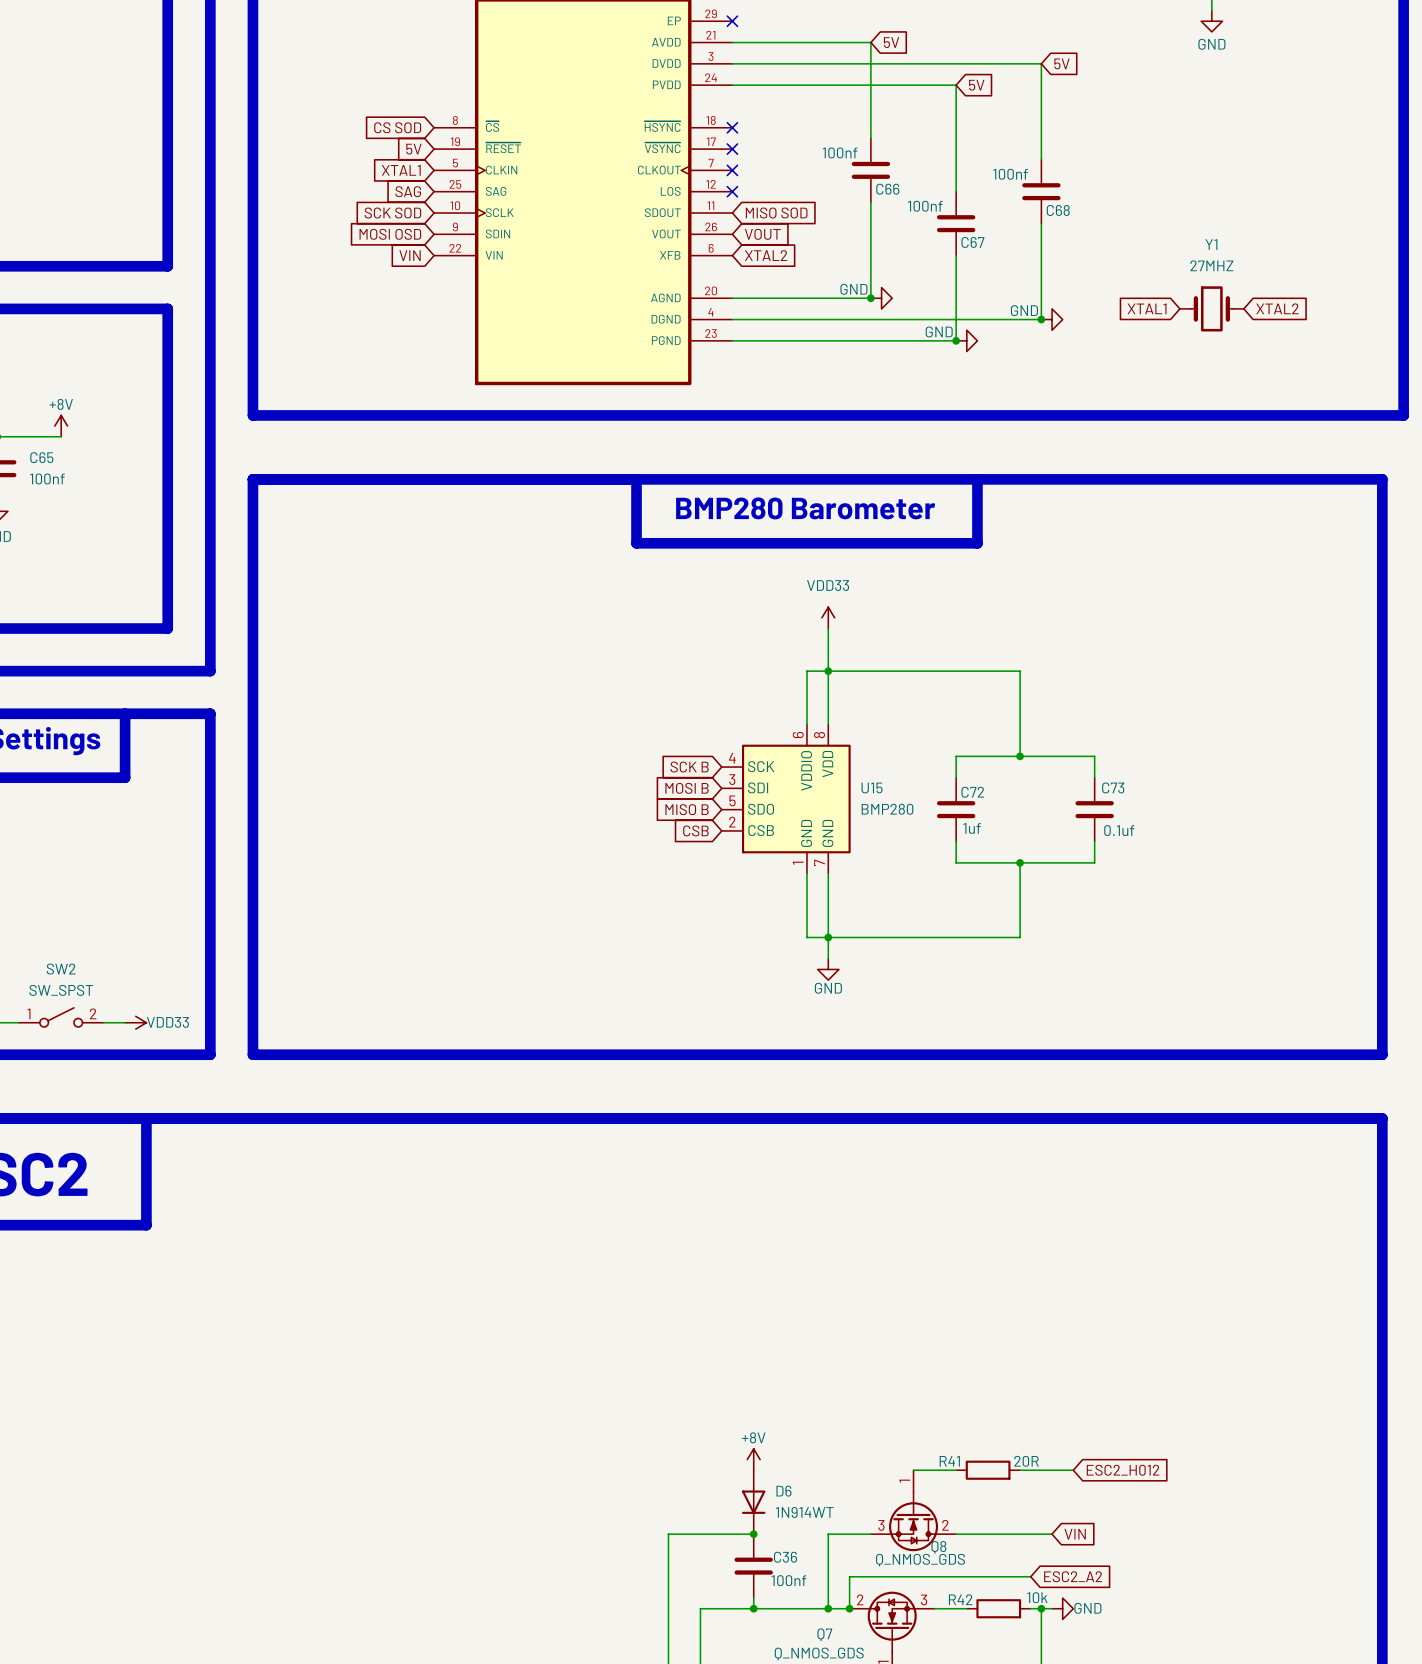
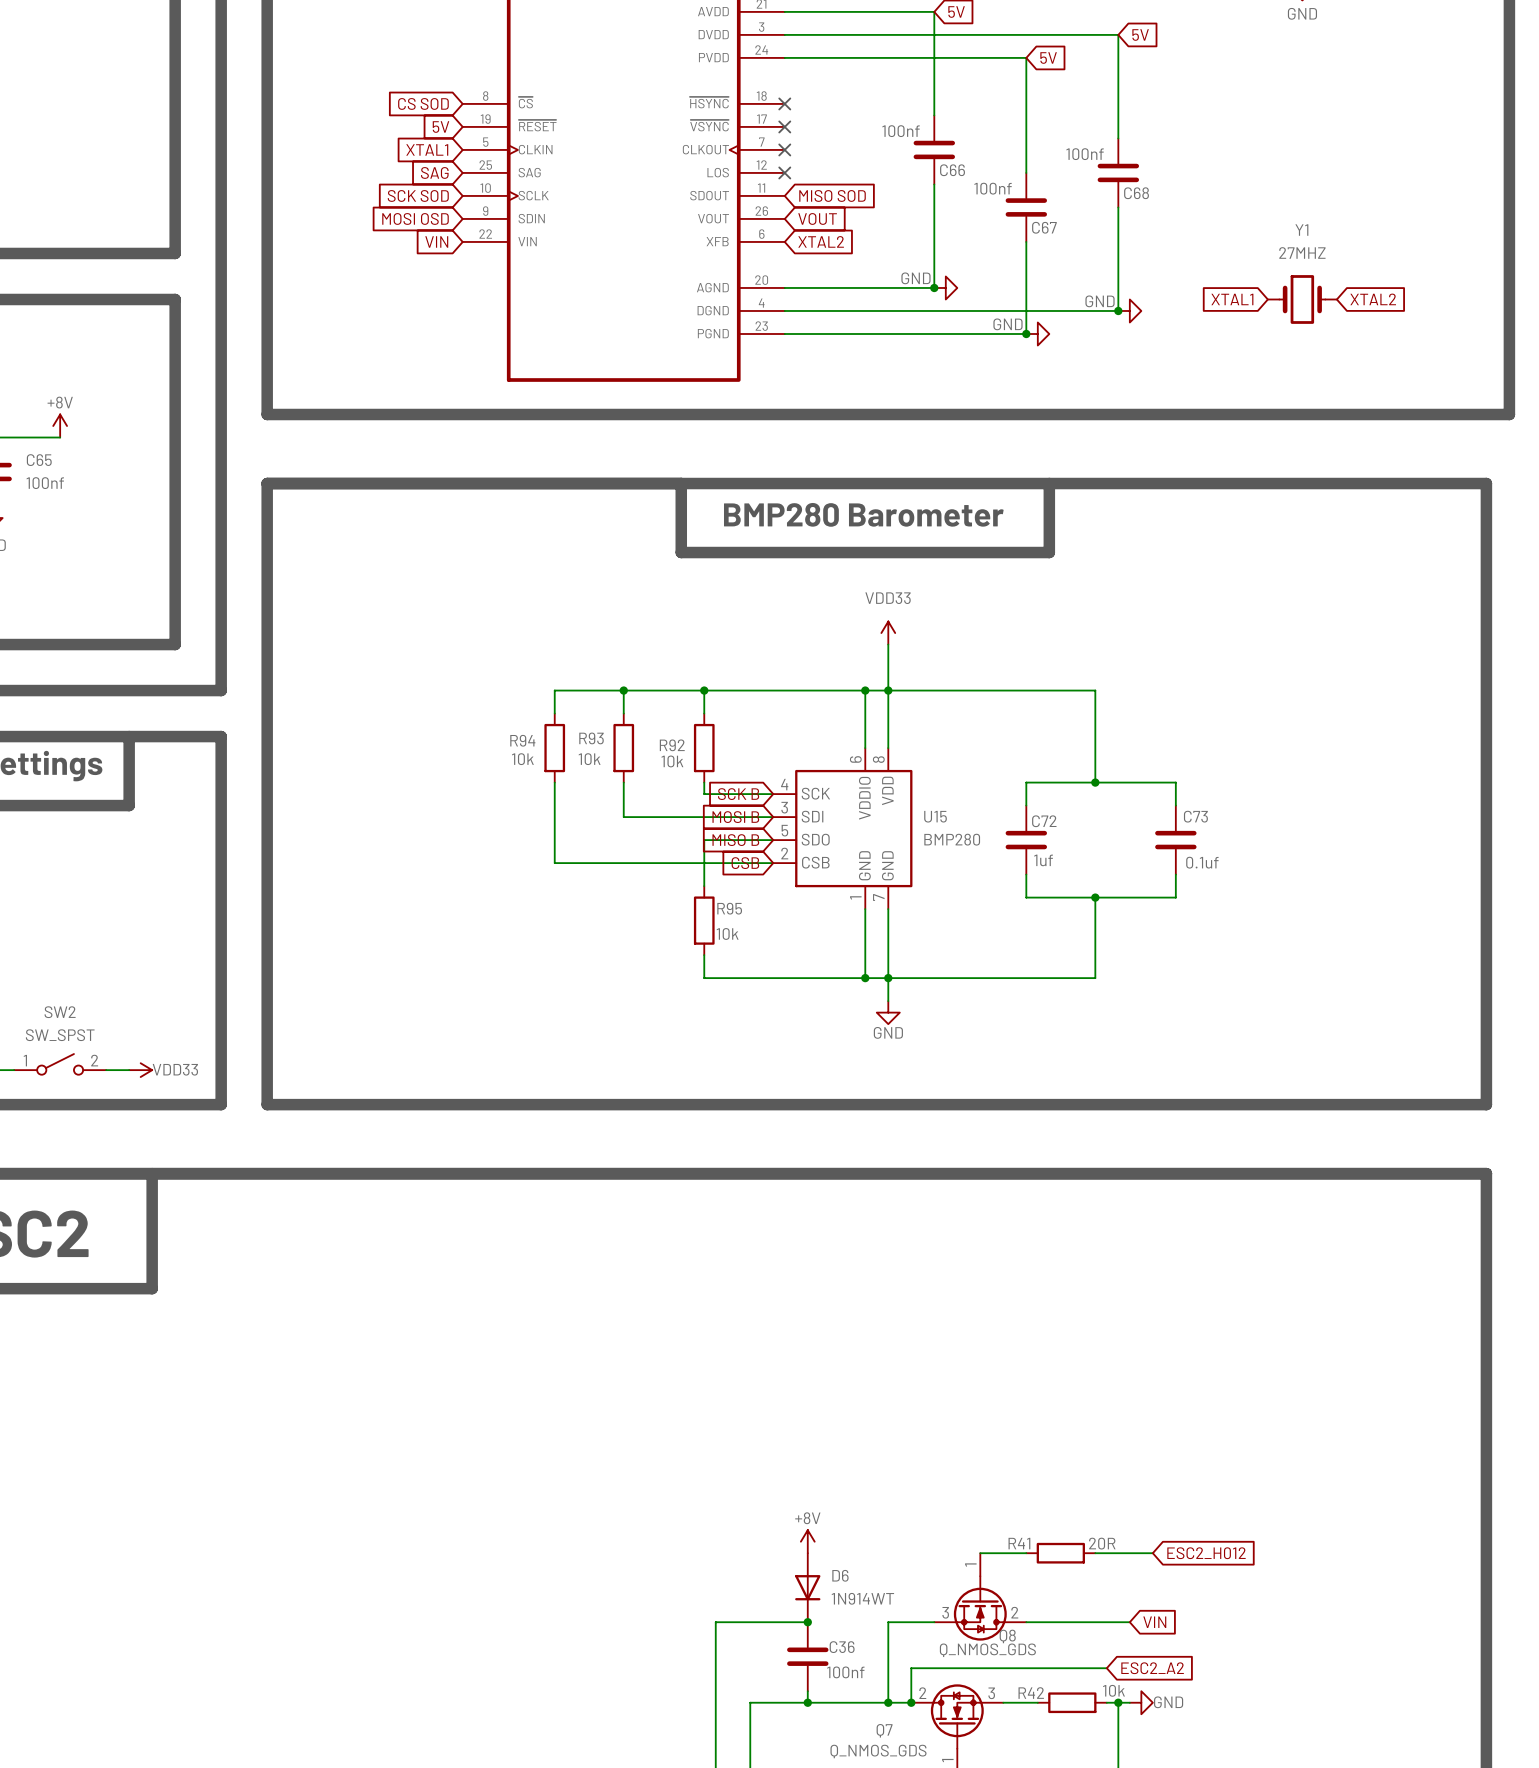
wire: none -> (623, 690) (623, 713)
junction: none -> (623, 690)
wire: none -> (704, 690) (704, 713)
junction: none -> (704, 690)
wire: none -> (865, 690) (554, 690) (554, 713)
junction: none -> (865, 690)
R94: none -> 10k (554, 748)
R93: none -> 10k (623, 748)
R92: none -> 10k (704, 748)
wire: none -> (554, 782) (554, 863) (773, 863)
wire: none -> (623, 782) (623, 817) (773, 817)
wire: none -> (704, 782) (704, 794) (773, 794)
wire: none -> (773, 840) (704, 840) (704, 886)
R95: none -> 10k (704, 920)
wire: none -> (704, 955) (704, 978) (865, 978)
junction: none -> (865, 978)

